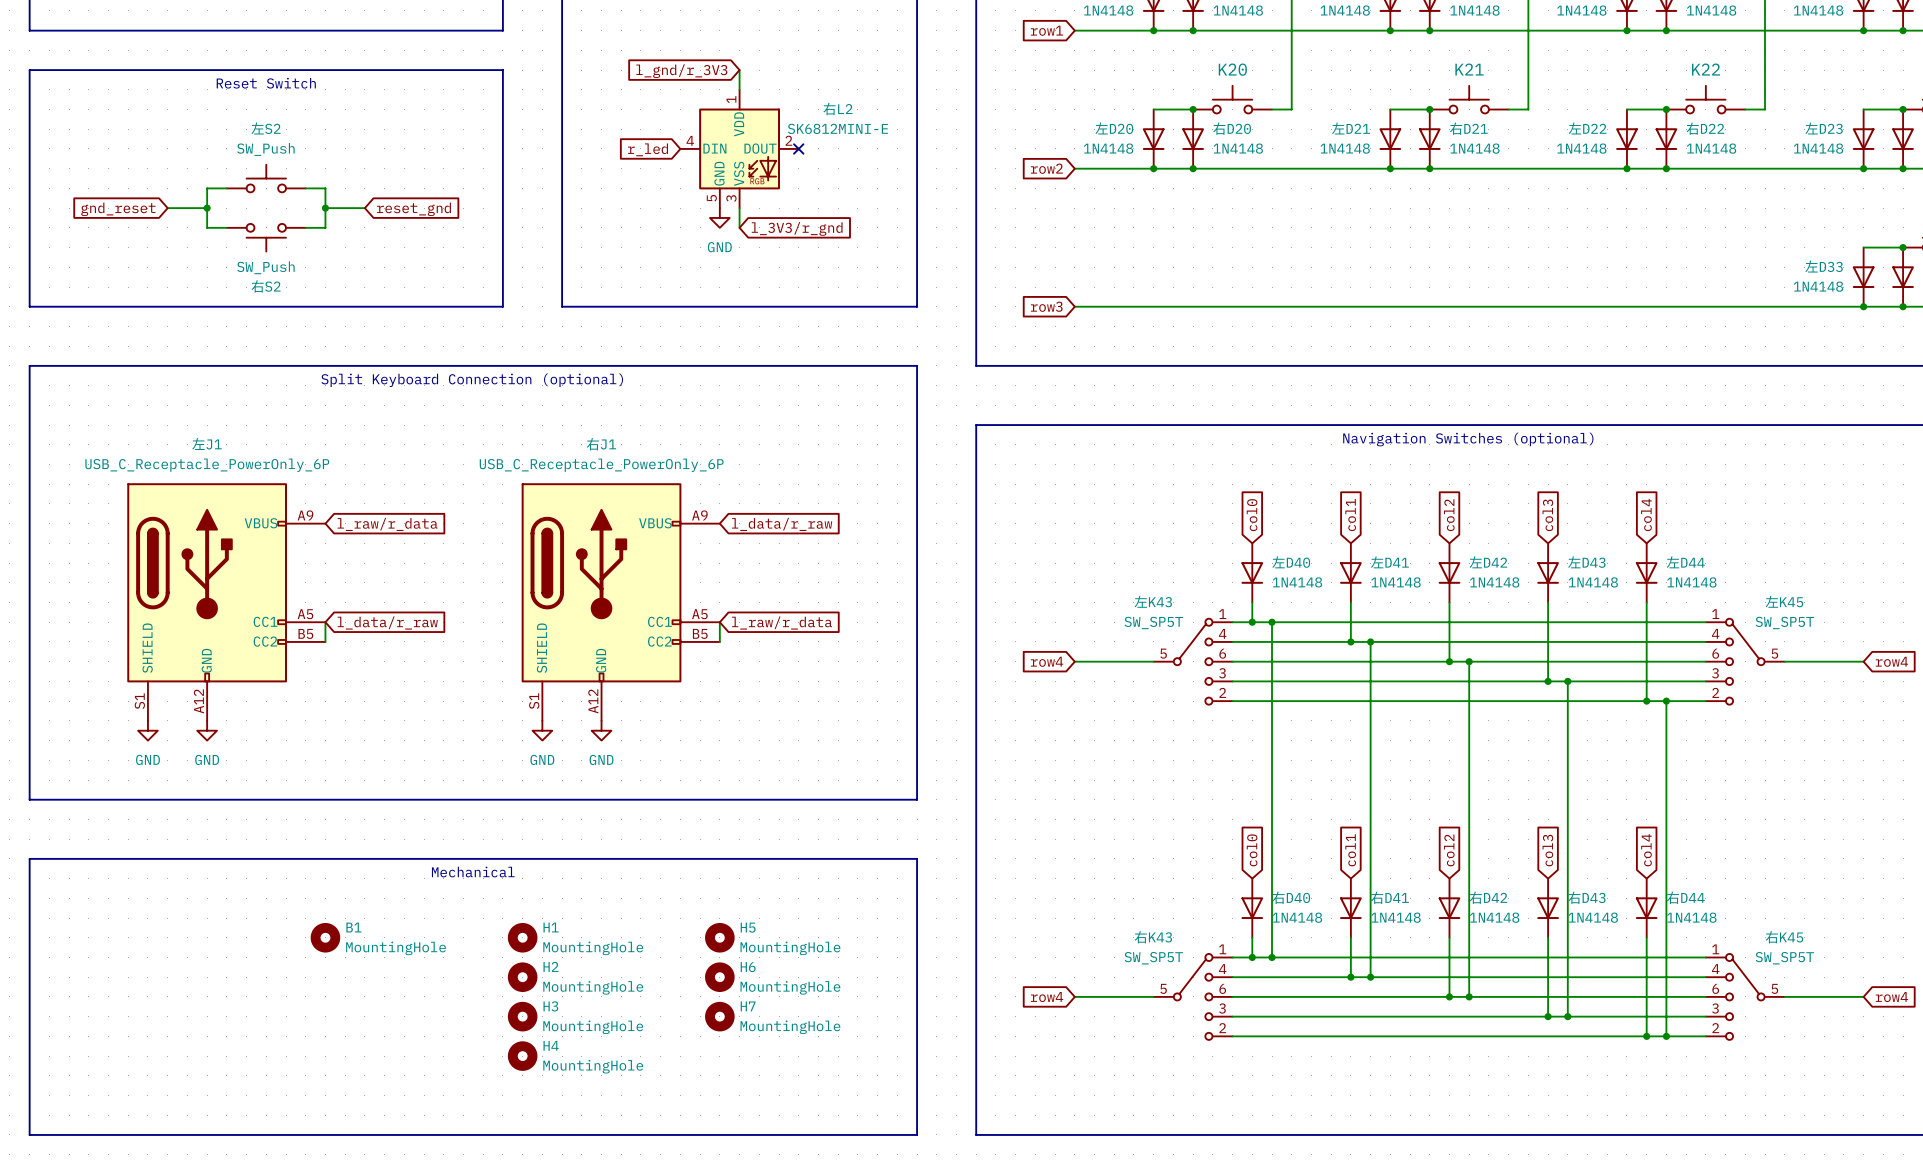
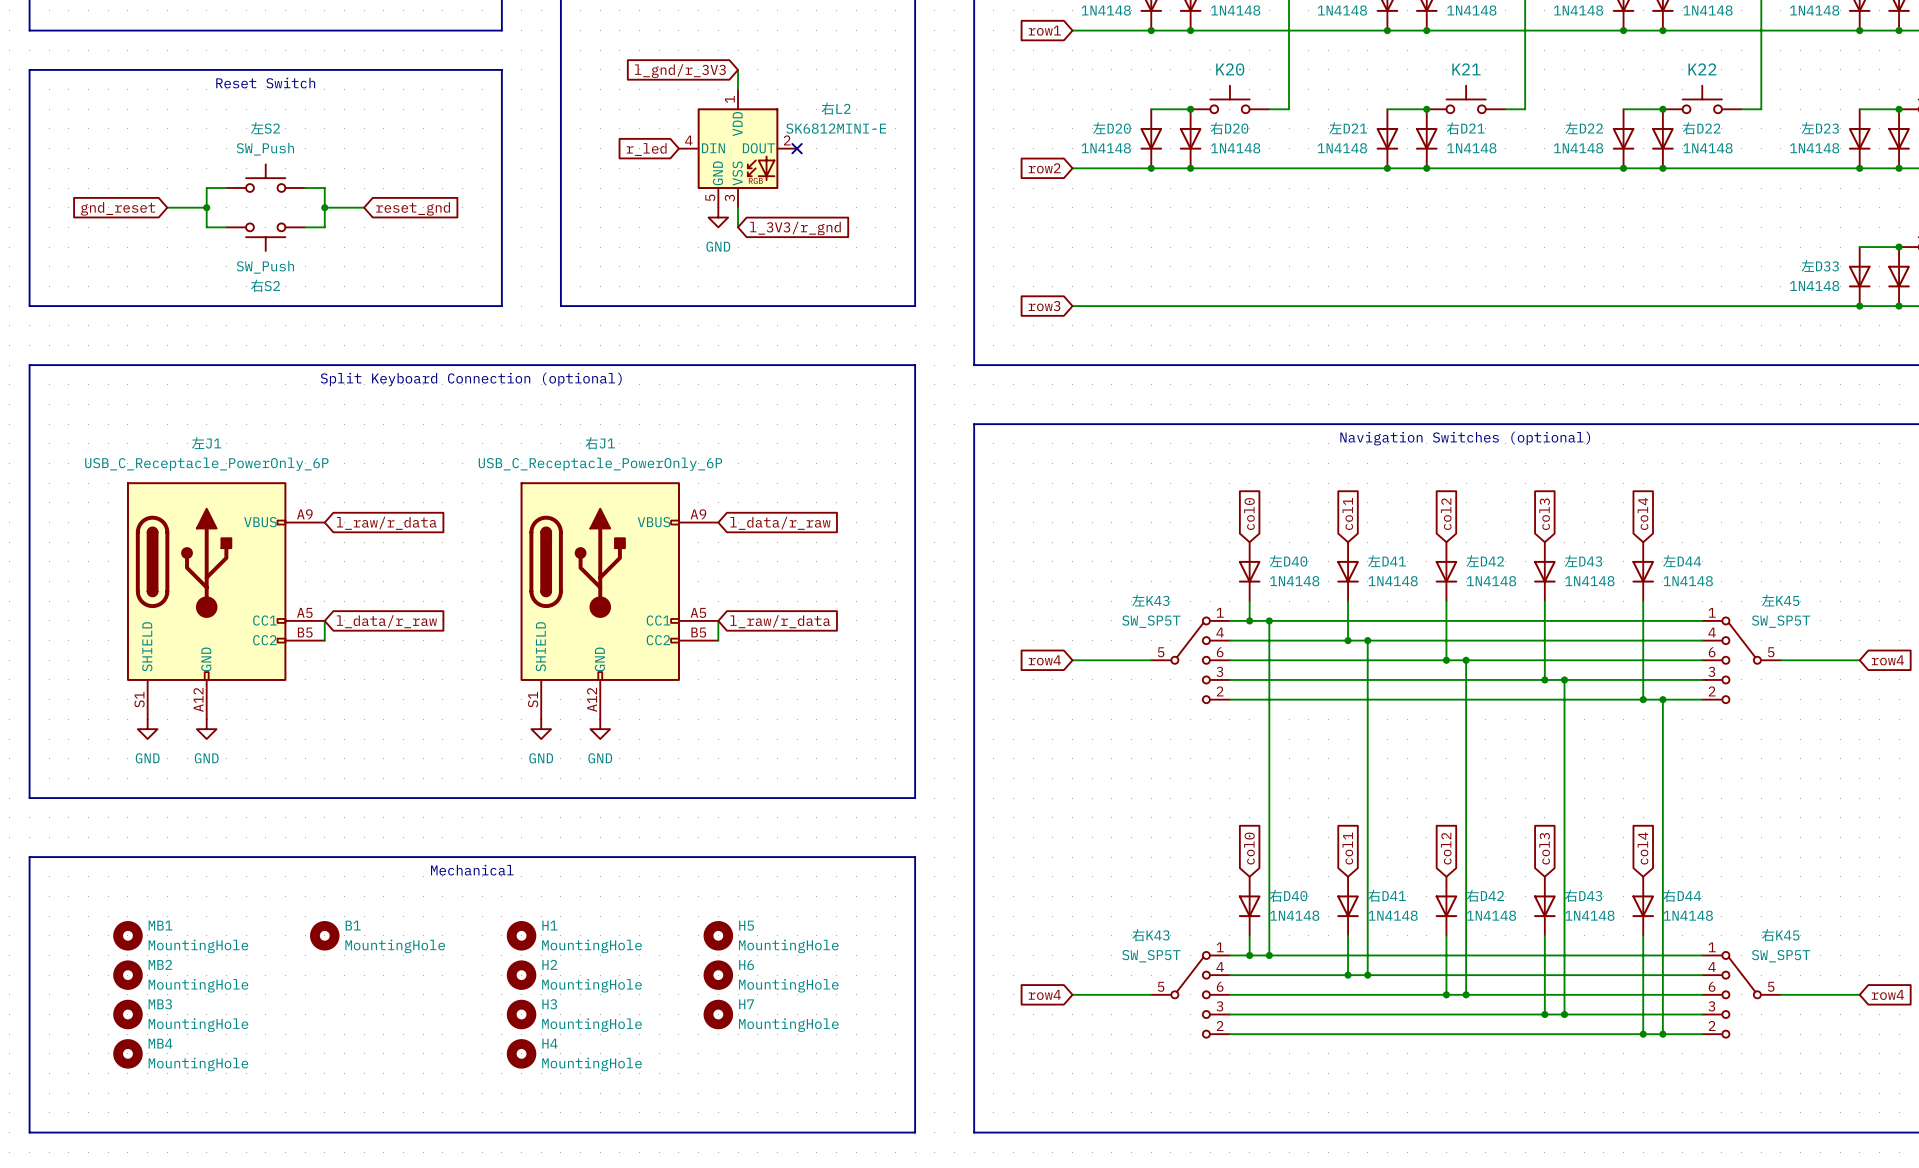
MB1: none -> MountingHole (127, 935)
MB2: none -> MountingHole (127, 975)
MB3: none -> MountingHole (127, 1014)
MB4: none -> MountingHole (127, 1053)

